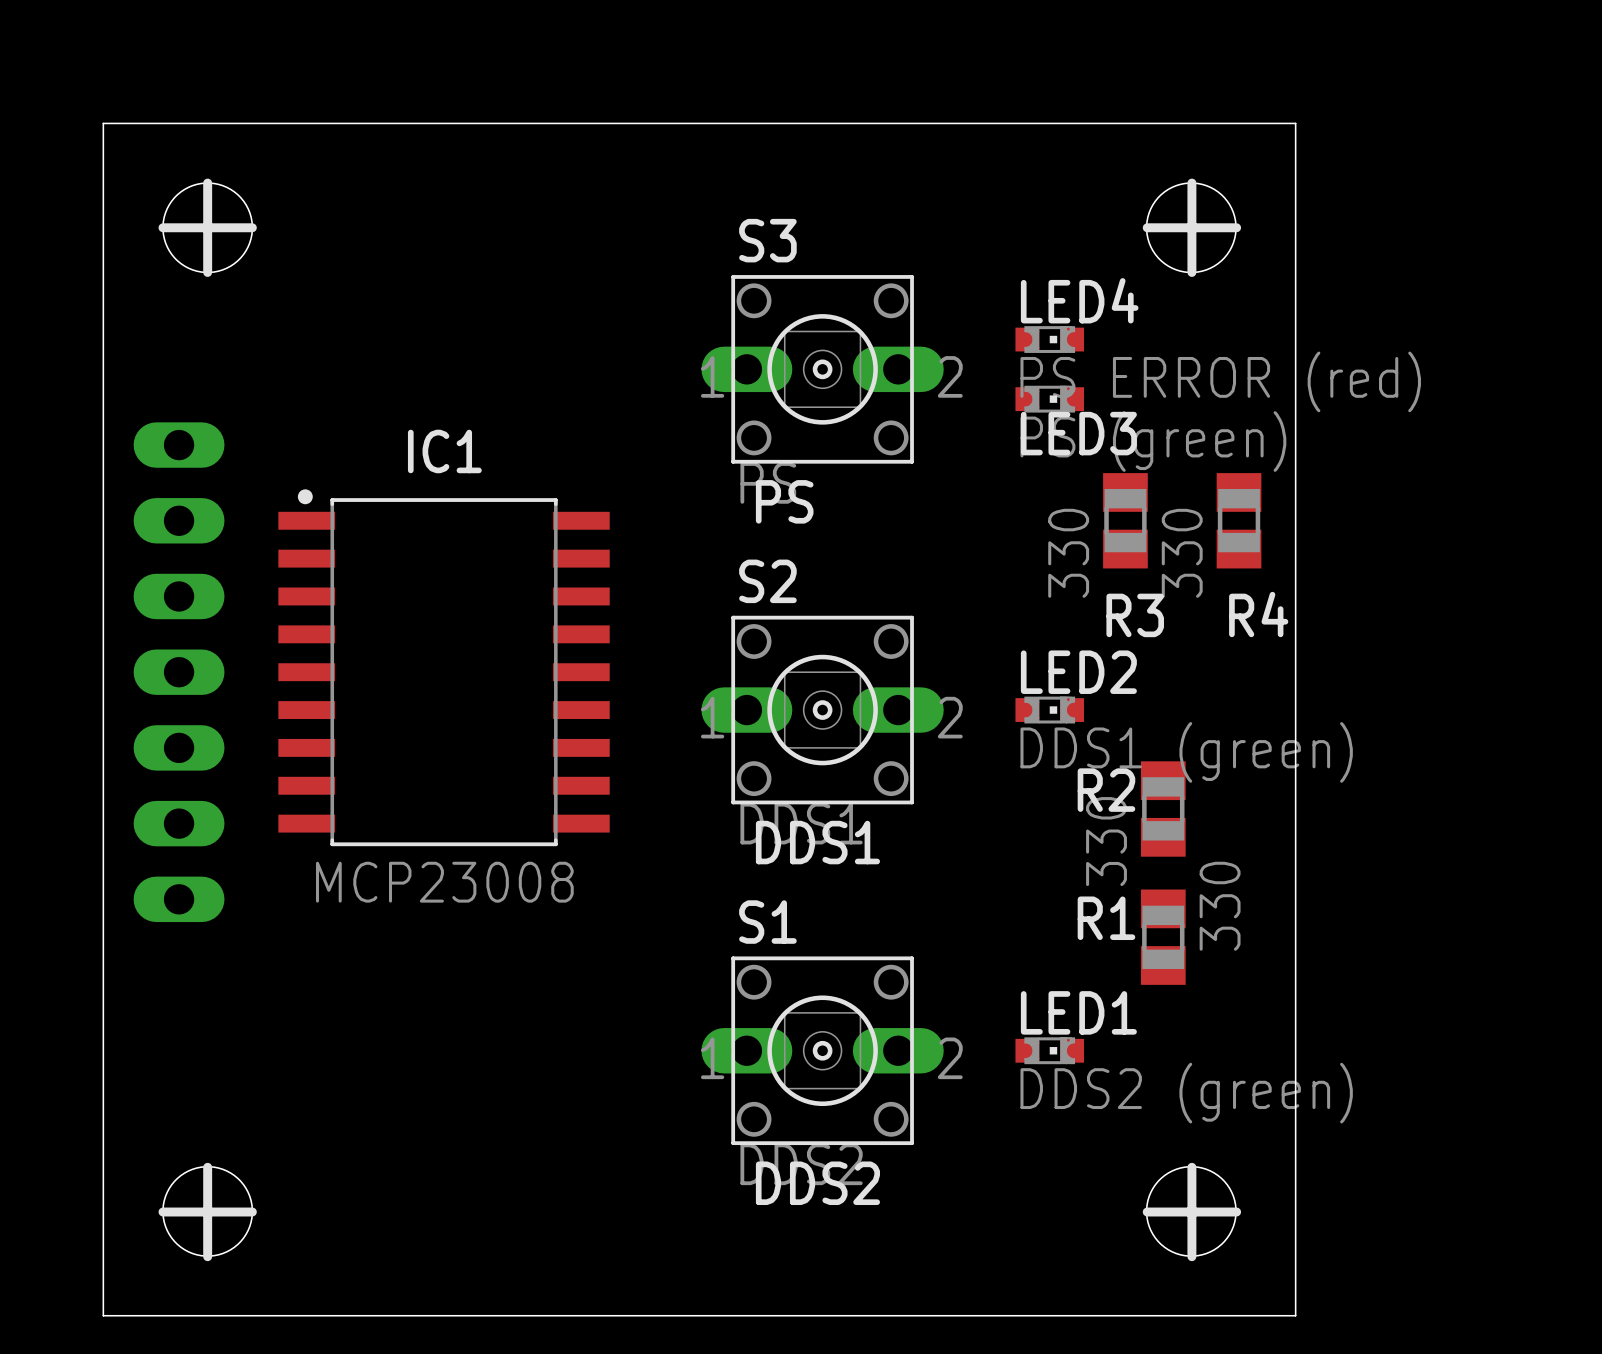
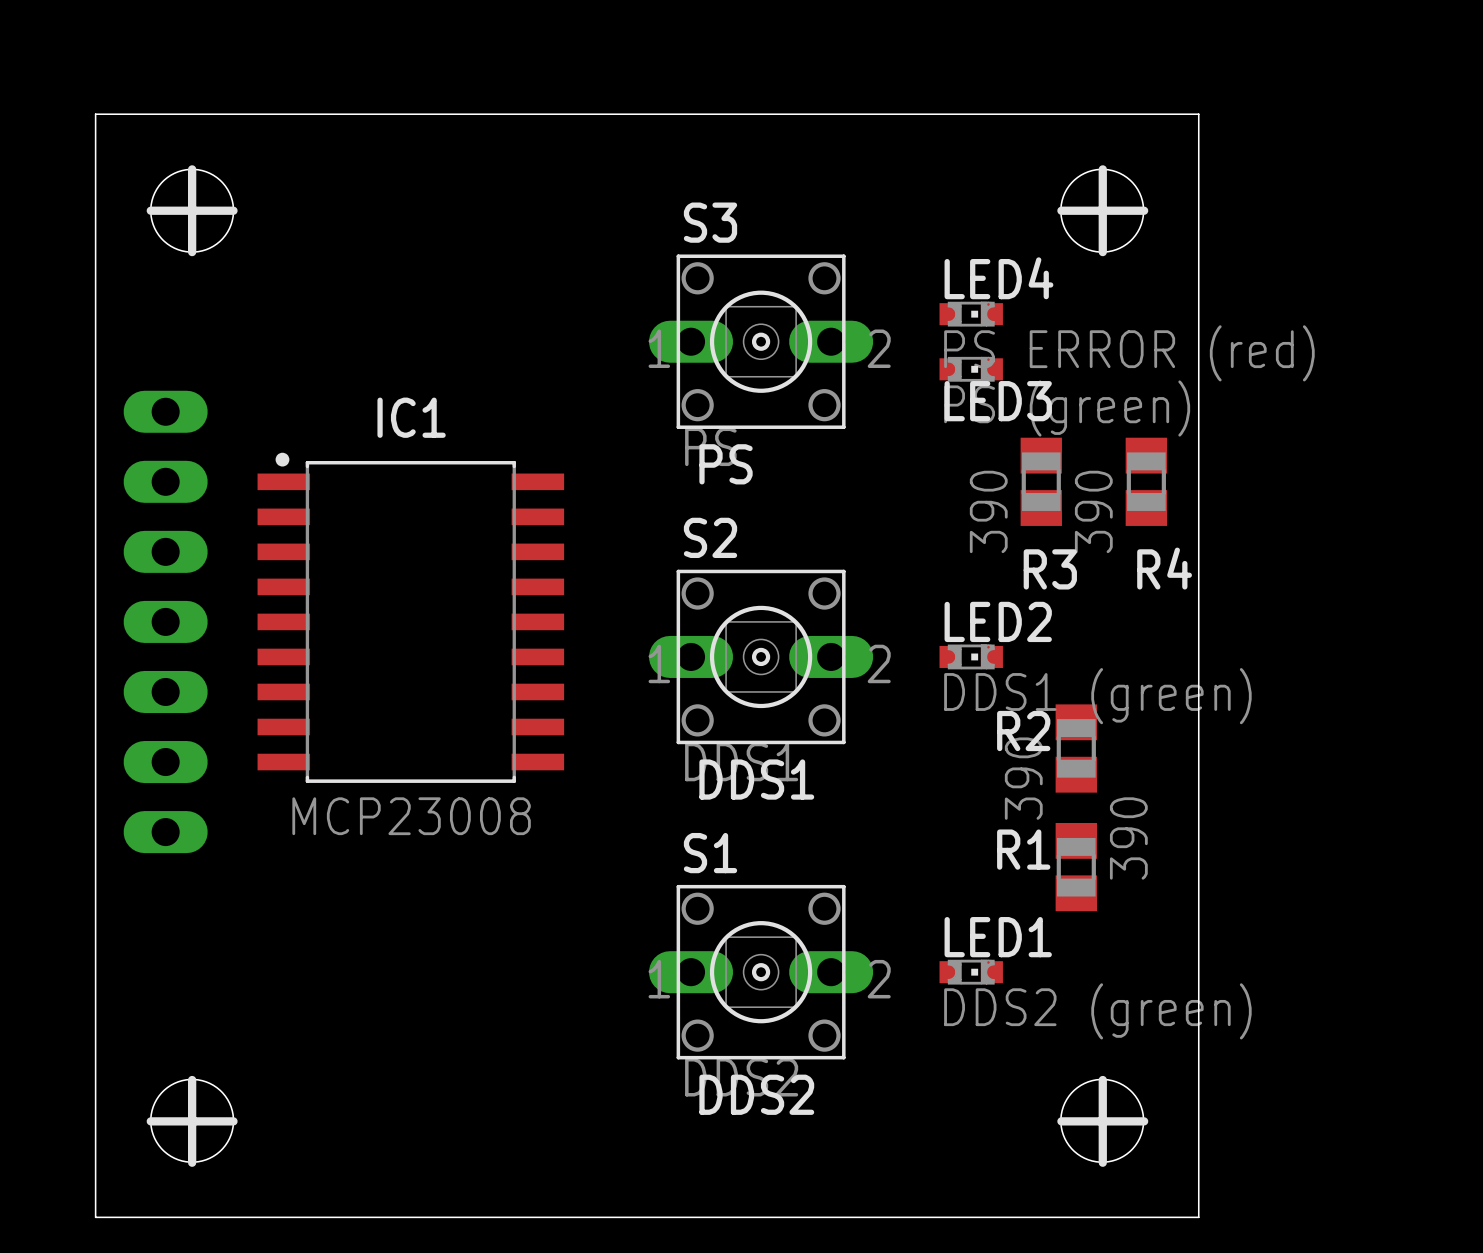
R3 value: 330 (1068, 553) -> 390 (988, 511)
R4 value: 330 (1182, 553) -> 390 (1093, 511)
R2 value: 330 (1106, 841) -> 390 (1023, 778)
R1 value: 330 (1220, 906) -> 390 (1128, 838)

